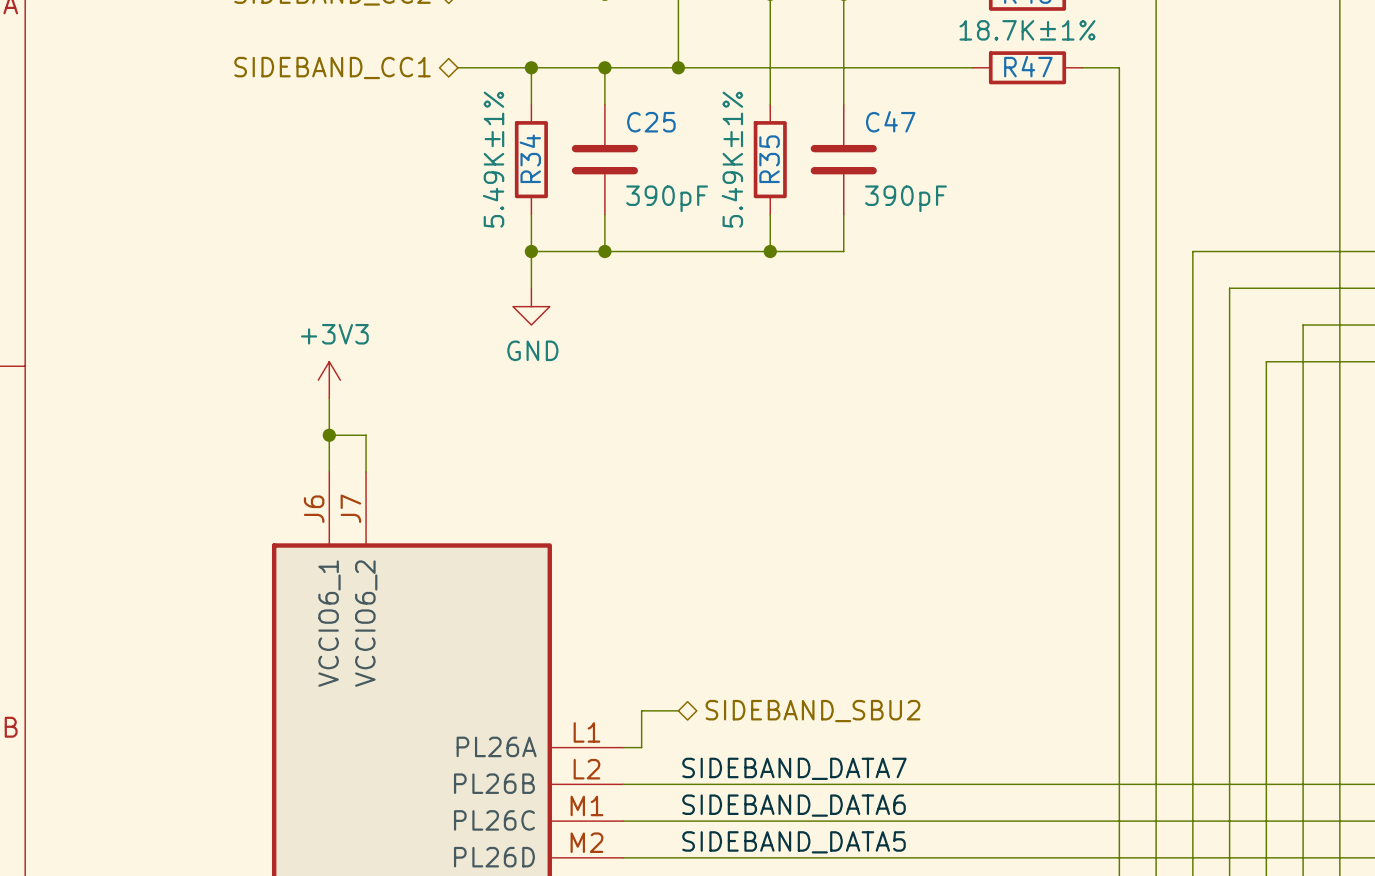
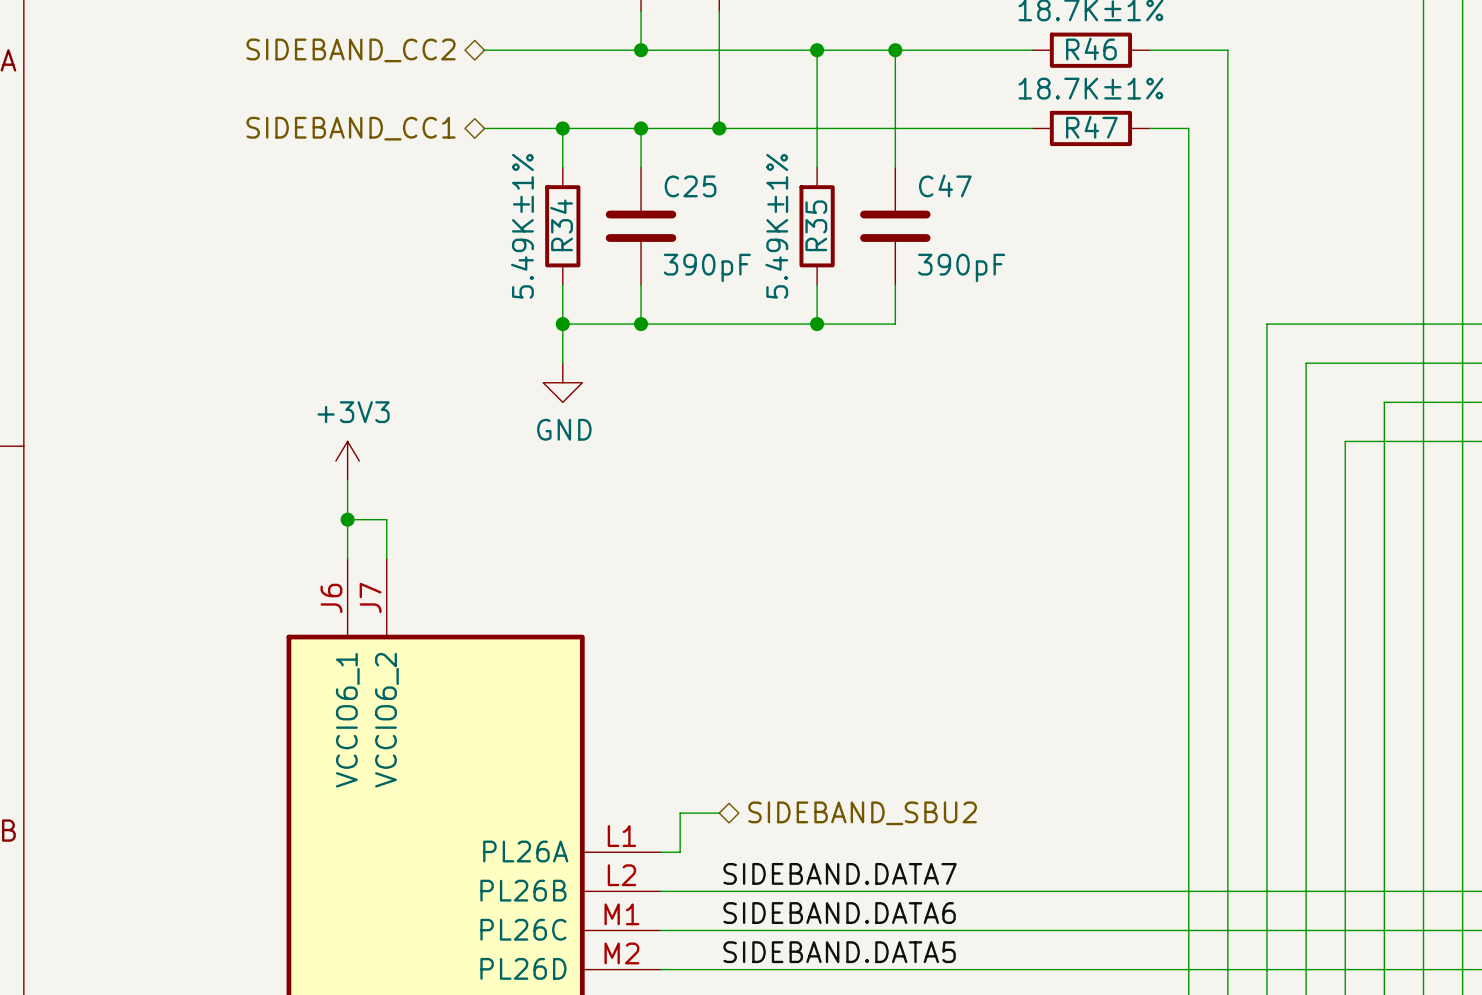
label: SIDEBAND_DATA7 (794, 768) -> SIDEBAND.DATA7 (840, 873)
label: SIDEBAND_DATA6 (794, 805) -> SIDEBAND.DATA6 (839, 913)
label: SIDEBAND_DATA5 (794, 842) -> SIDEBAND.DATA5 (839, 952)

